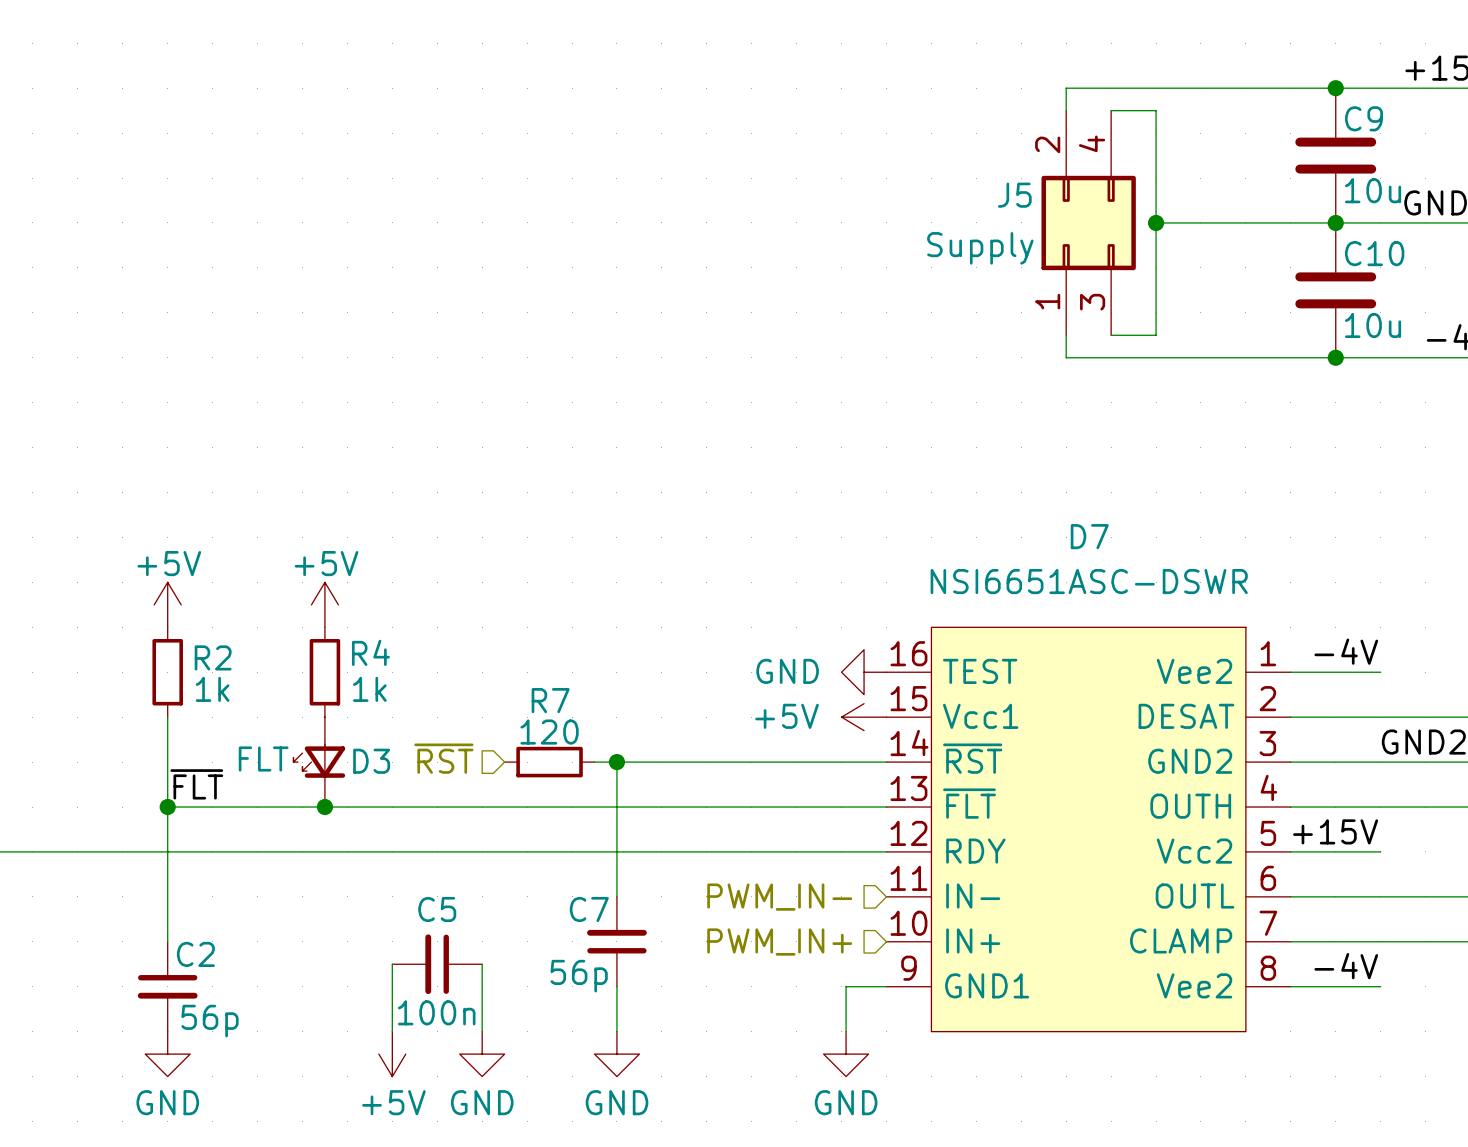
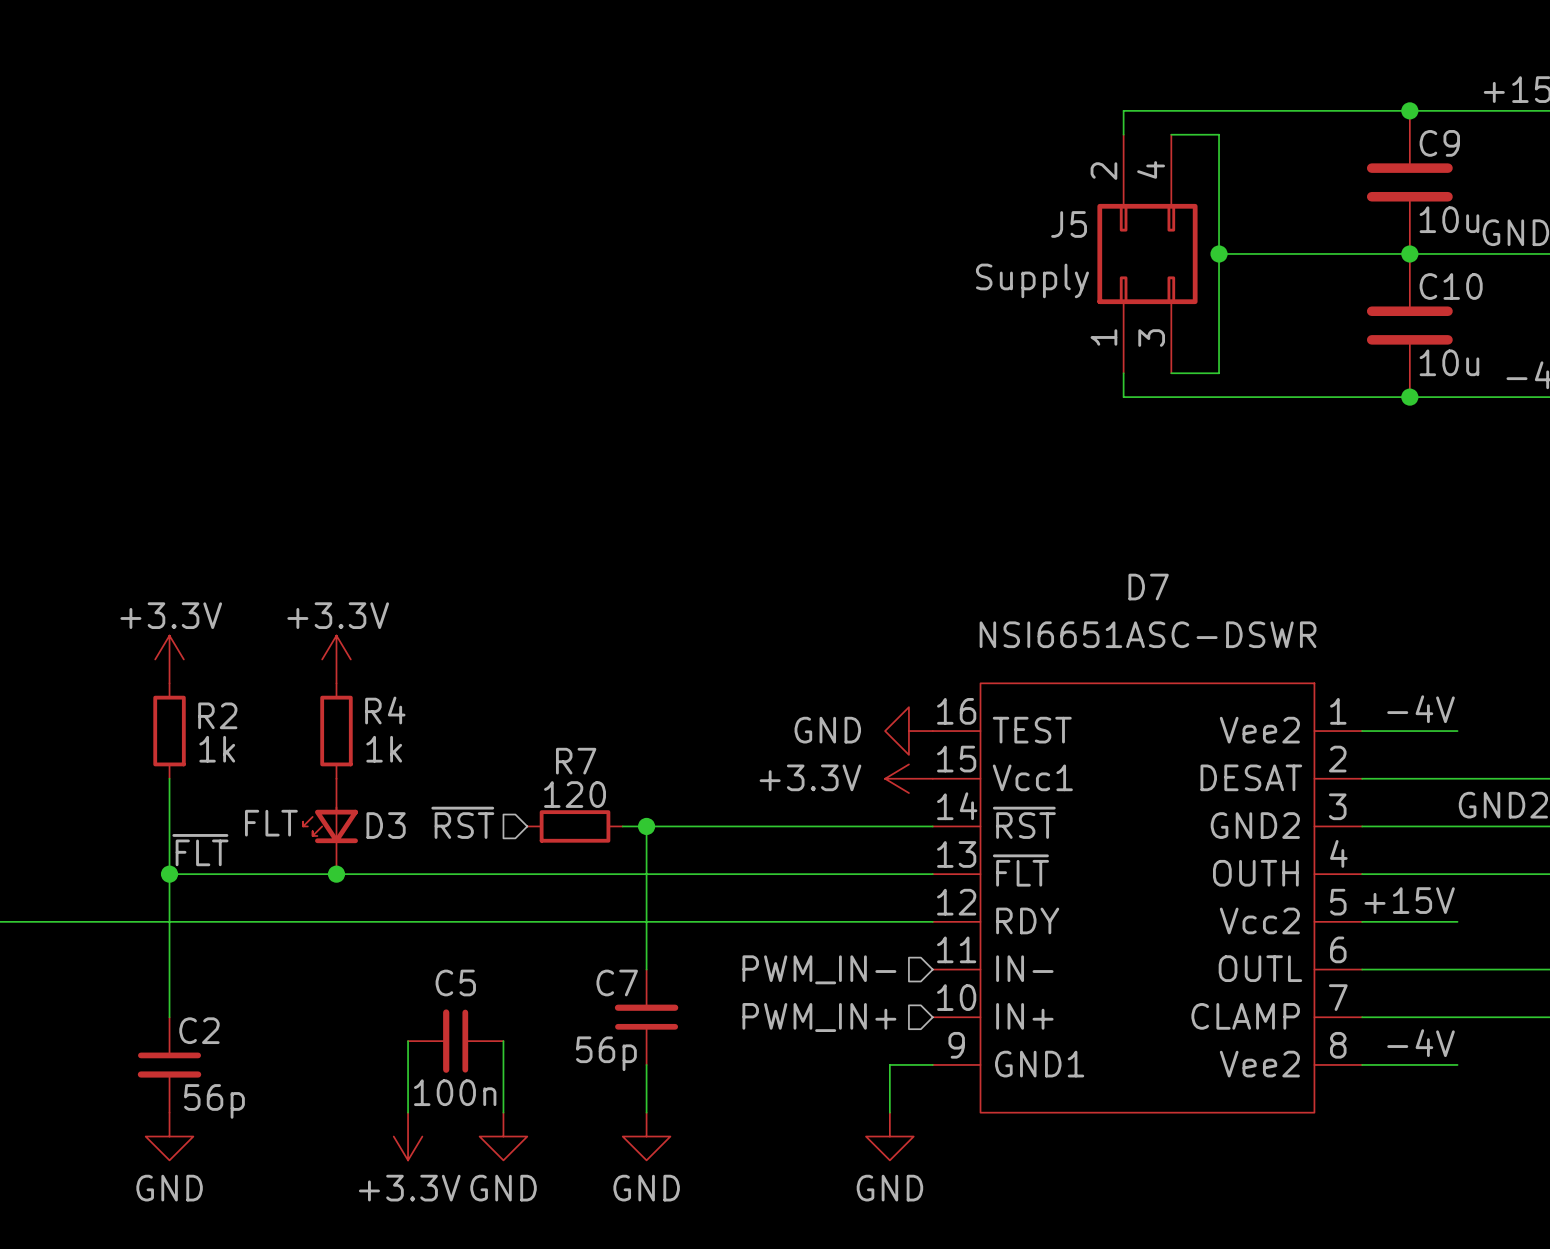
power symbol: +5V (167, 604) -> +3.3V (169, 659)
power symbol: +5V (324, 604) -> +3.3V (336, 659)
power symbol: +5V (864, 717) -> +3.3V (908, 778)
power symbol: +5V (392, 1054) -> +3.3V (408, 1136)

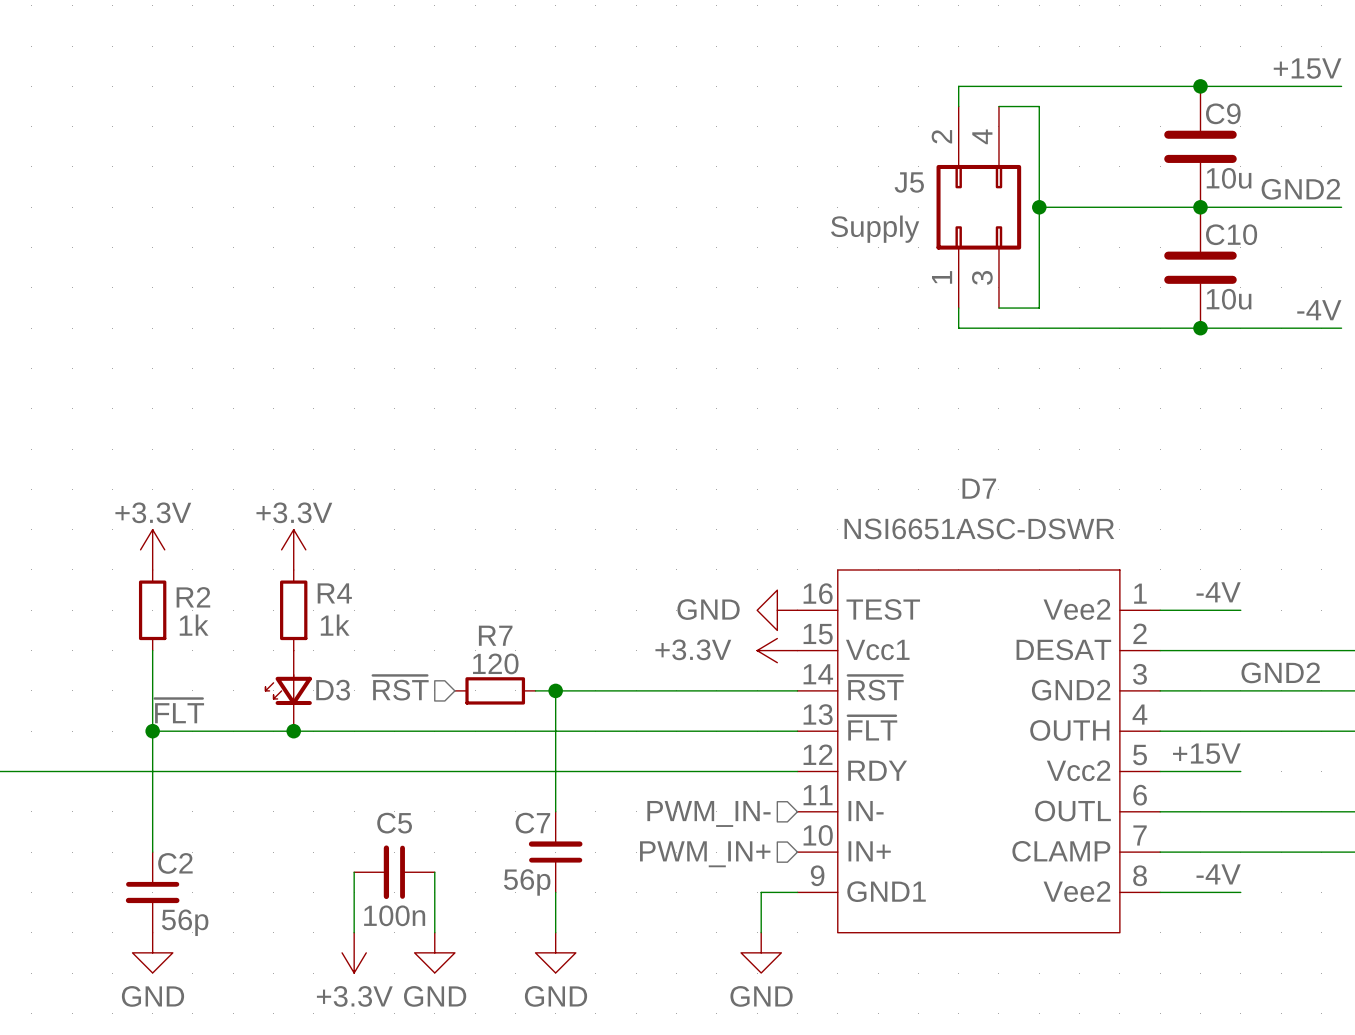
D3 text: FLT (271, 823) -> none

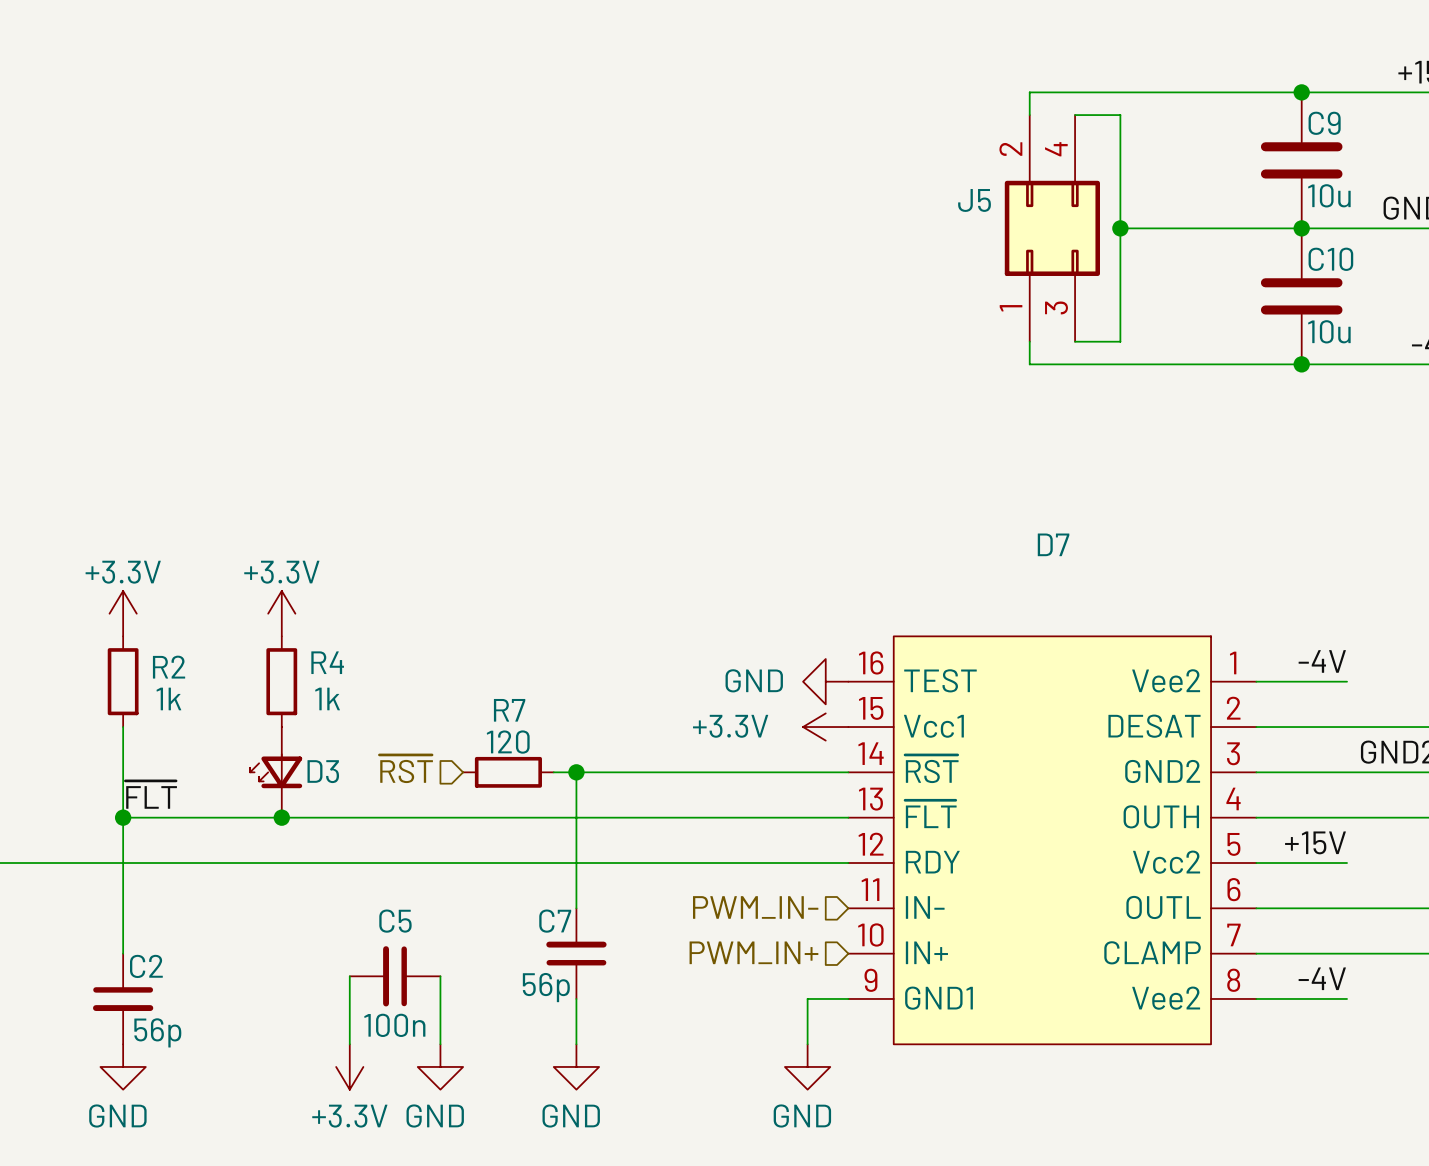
J5 value: Supply (875, 229) -> none
D7 value: NSI6651ASC-DSWR (979, 528) -> none

